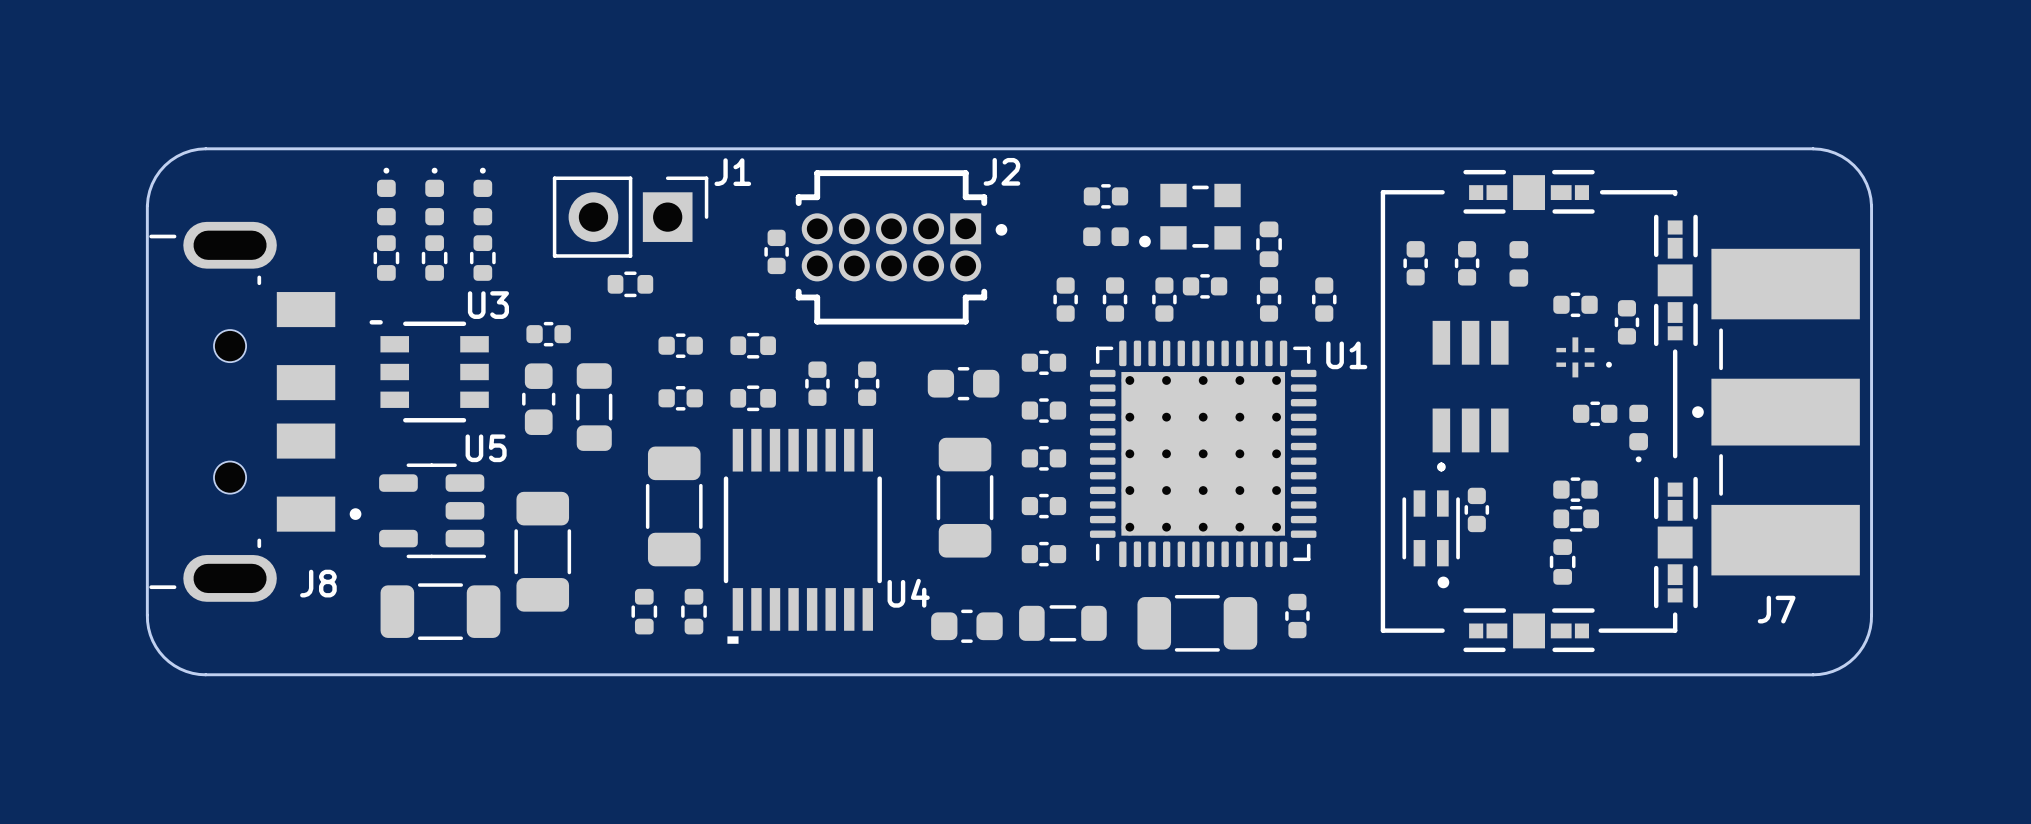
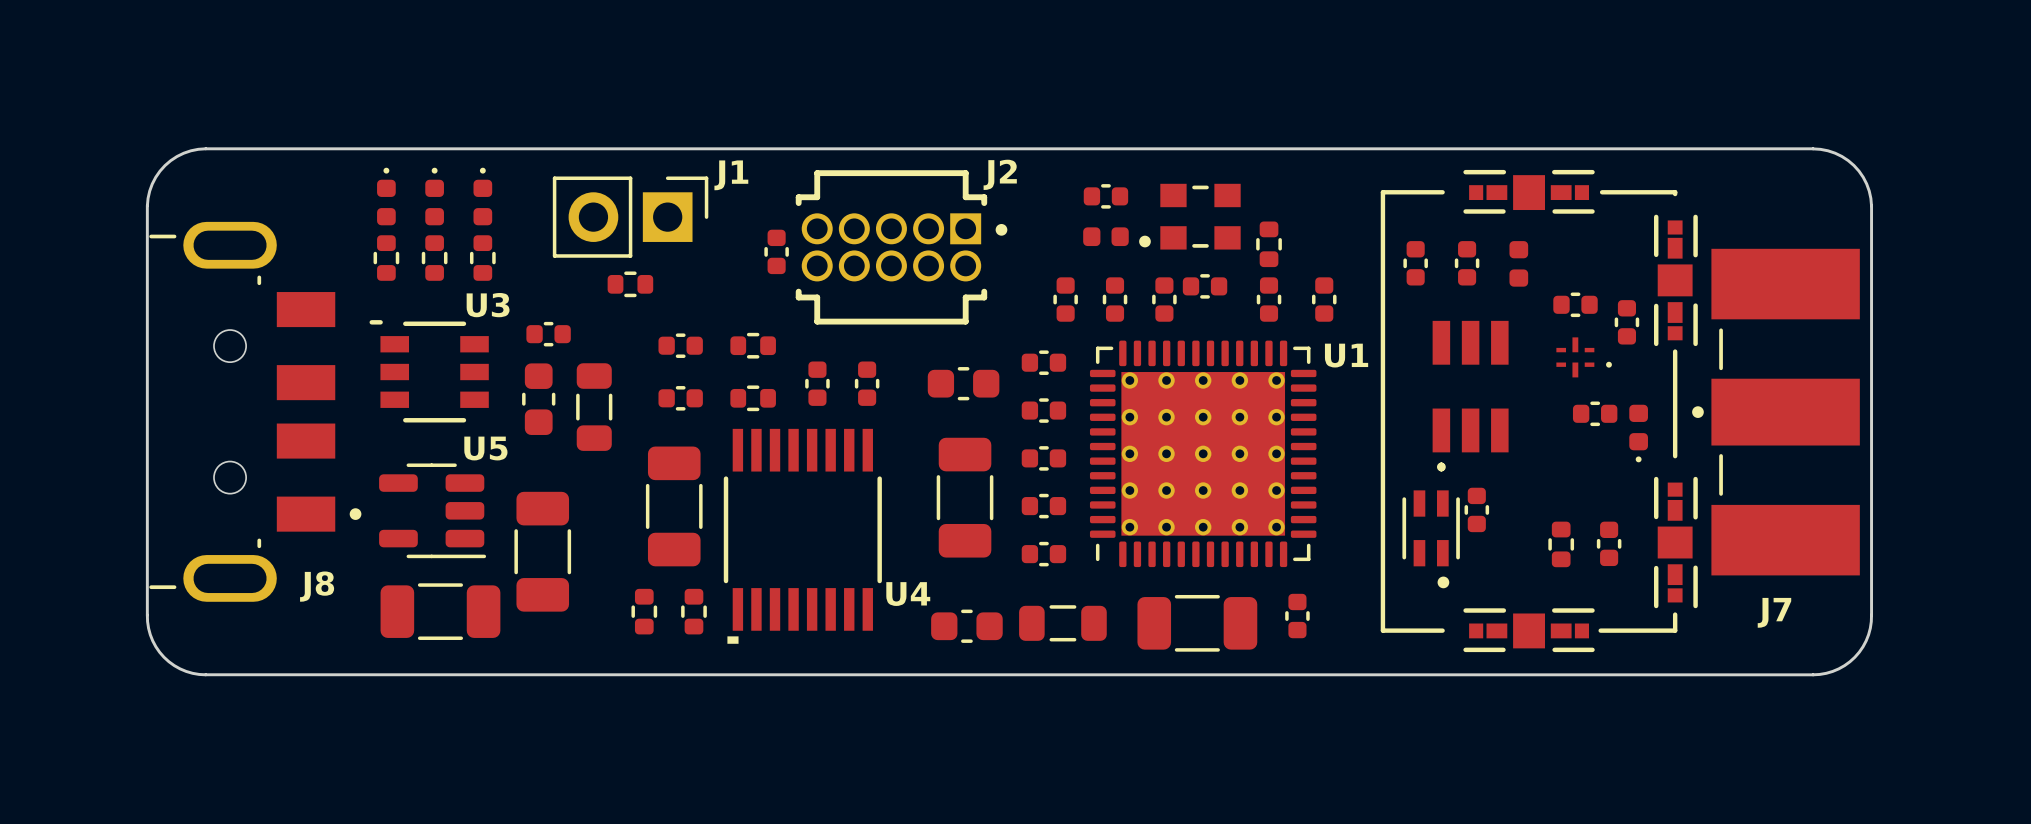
part rotation: 0° (1575, 489) -> 90° clockwise (1609, 543)
part position: (1575, 489) -> (1609, 543)
part: (1576, 518) -> none
part: none -> (1561, 544)
part: (1562, 561) -> none

